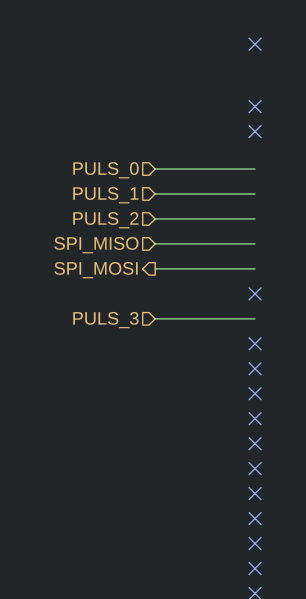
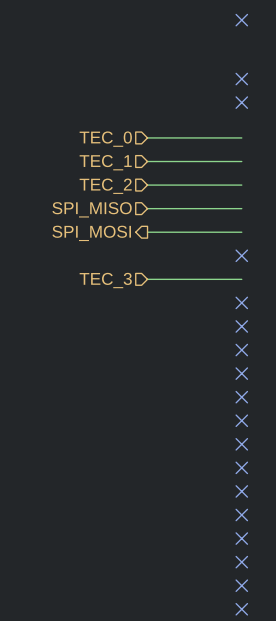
hierarchical label: PULS_0 (105, 170) -> TEC_0 (105, 139)
hierarchical label: PULS_1 (105, 195) -> TEC_1 (105, 162)
hierarchical label: PULS_2 (105, 220) -> TEC_2 (105, 186)
hierarchical label: PULS_3 (105, 320) -> TEC_3 (105, 280)

